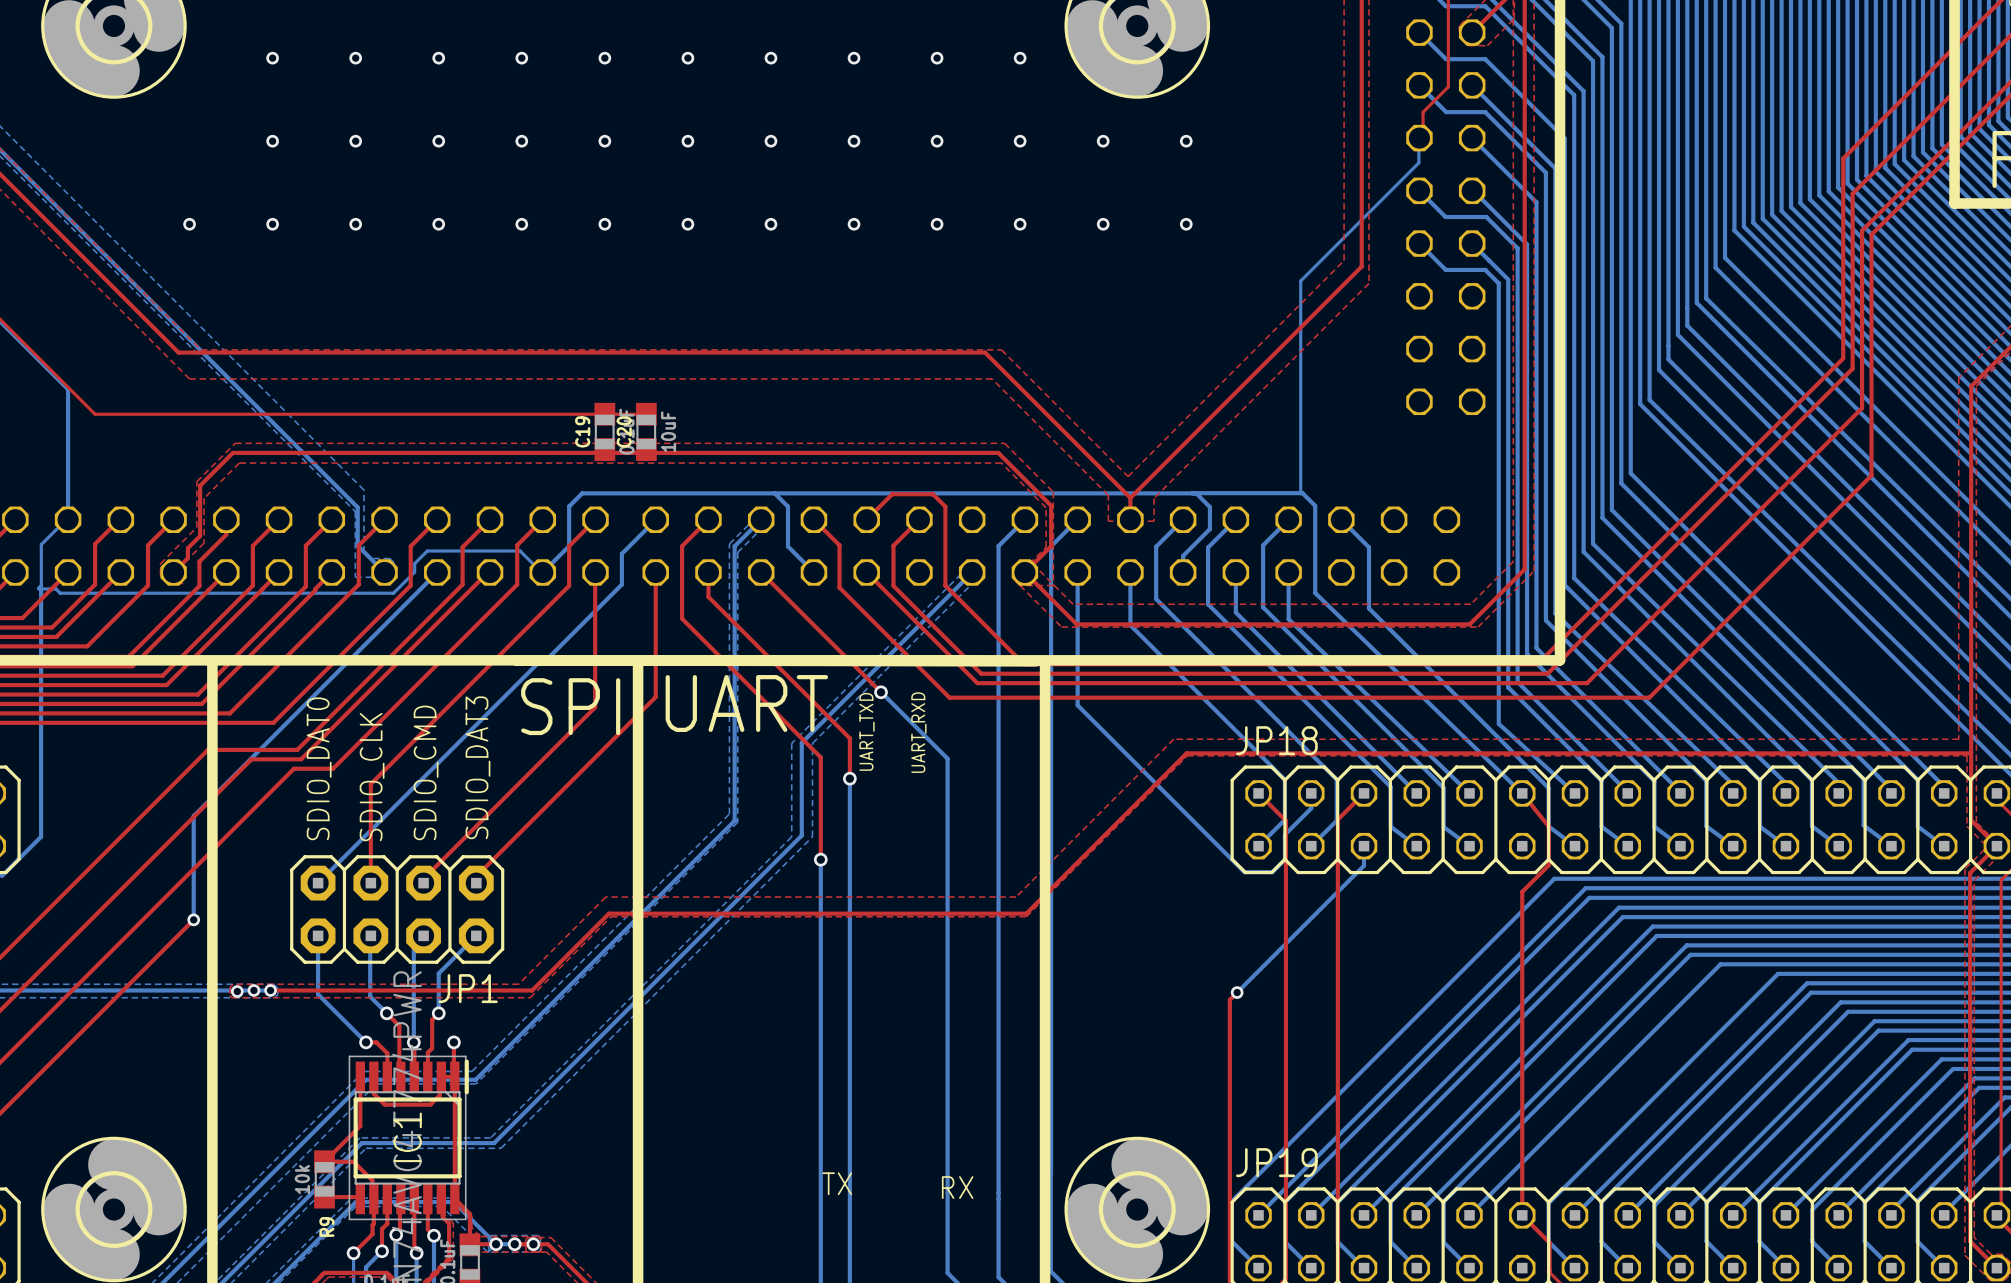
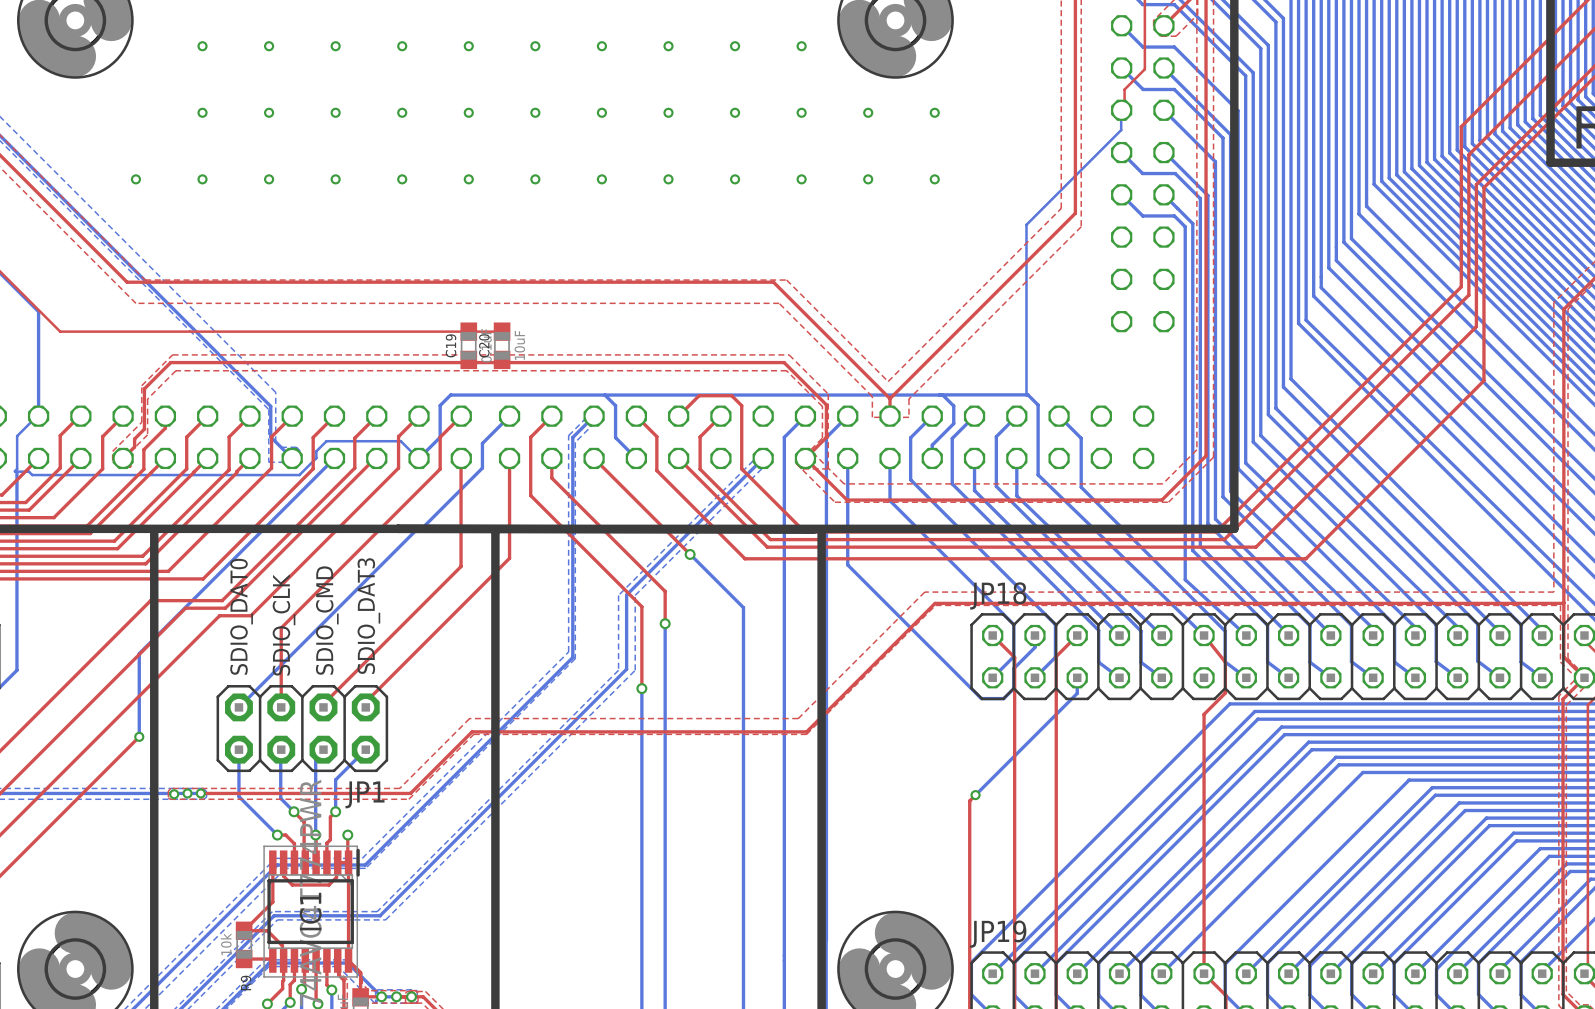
text: UART (746, 703) -> none
text: SPI (570, 706) -> none
text: UART_TXD (866, 731) -> none
text: UART_RXD (918, 732) -> none
text: TX (837, 1183) -> none
text: RX (957, 1187) -> none

